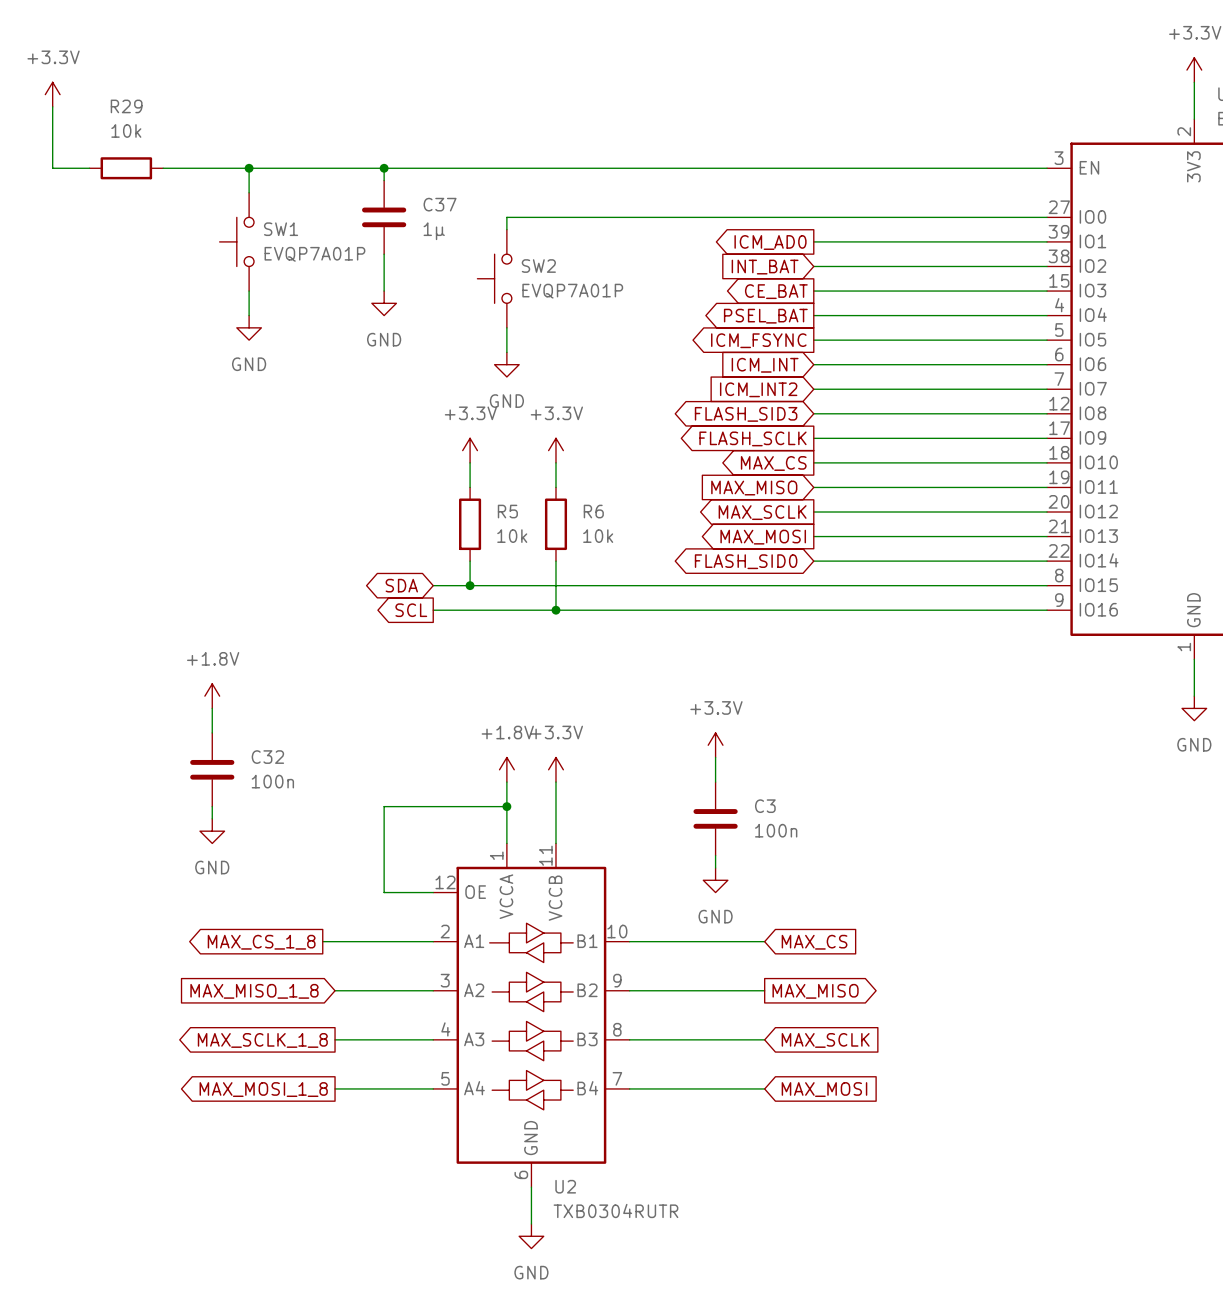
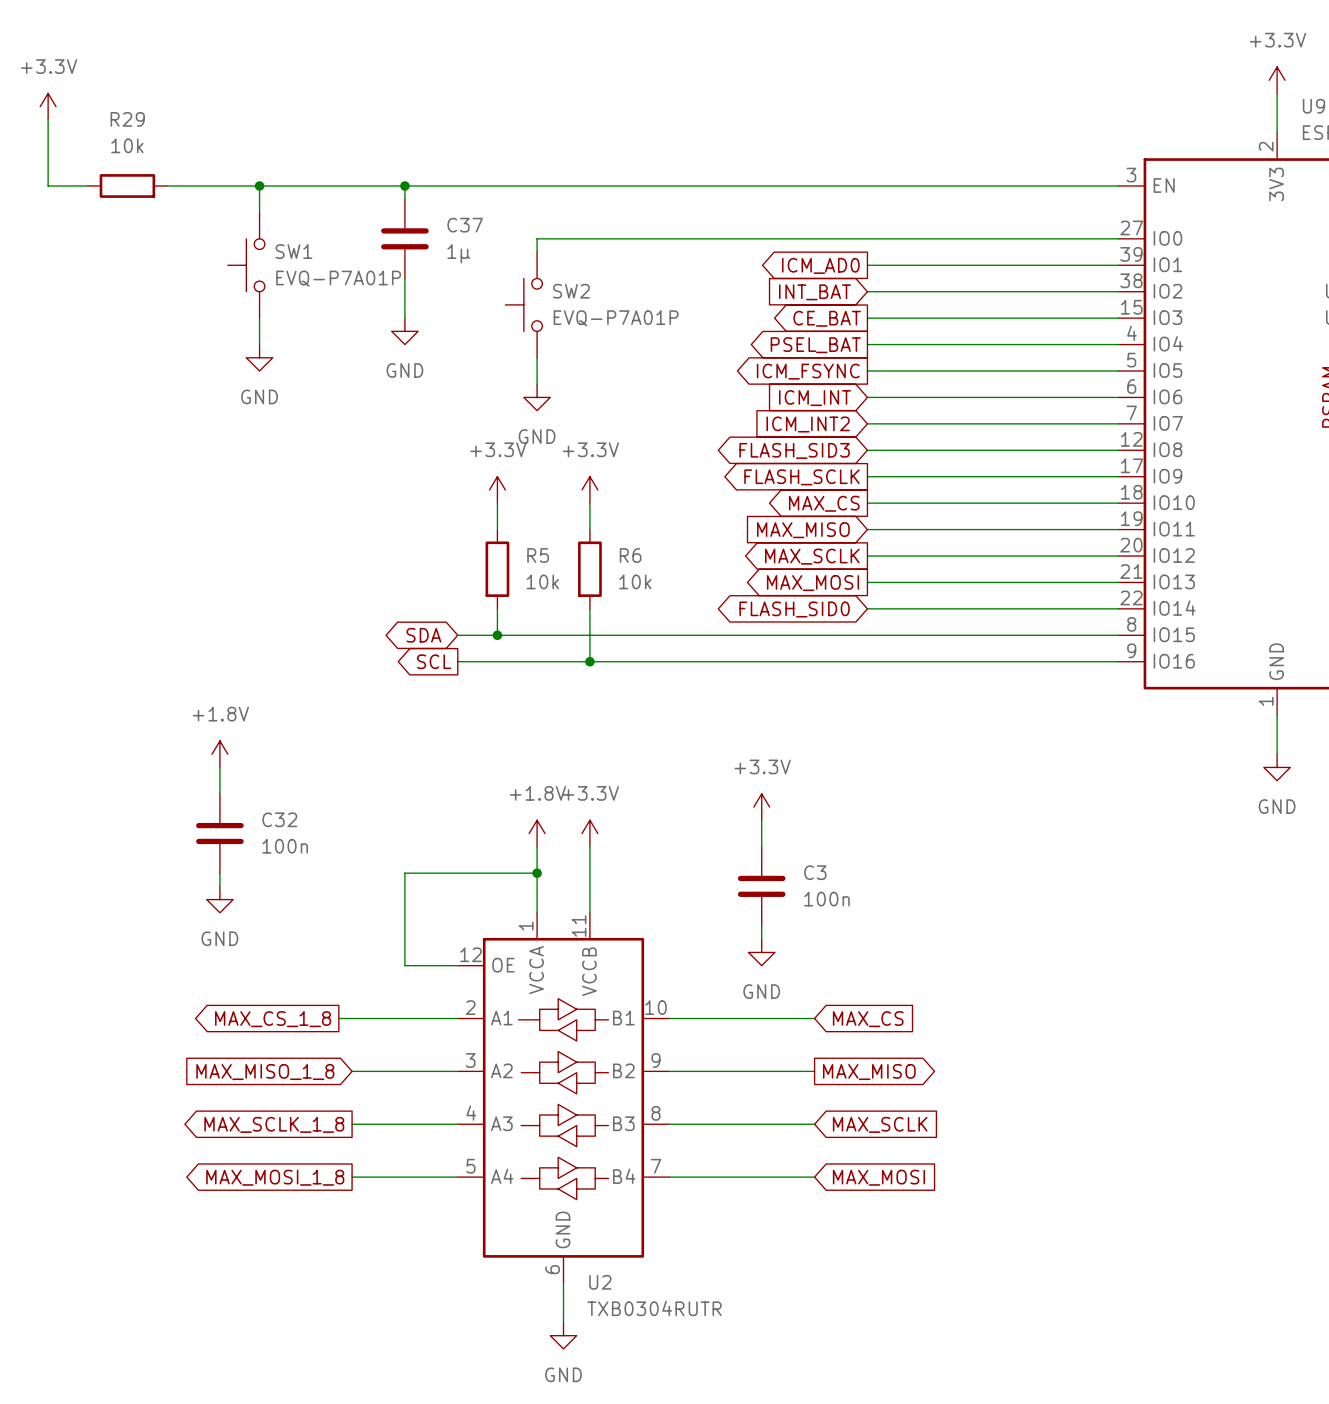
SW1 value: EVQP7A01P (314, 254) -> EVQ-P7A01P (338, 278)
SW2 value: EVQP7A01P (572, 291) -> EVQ-P7A01P (616, 318)

